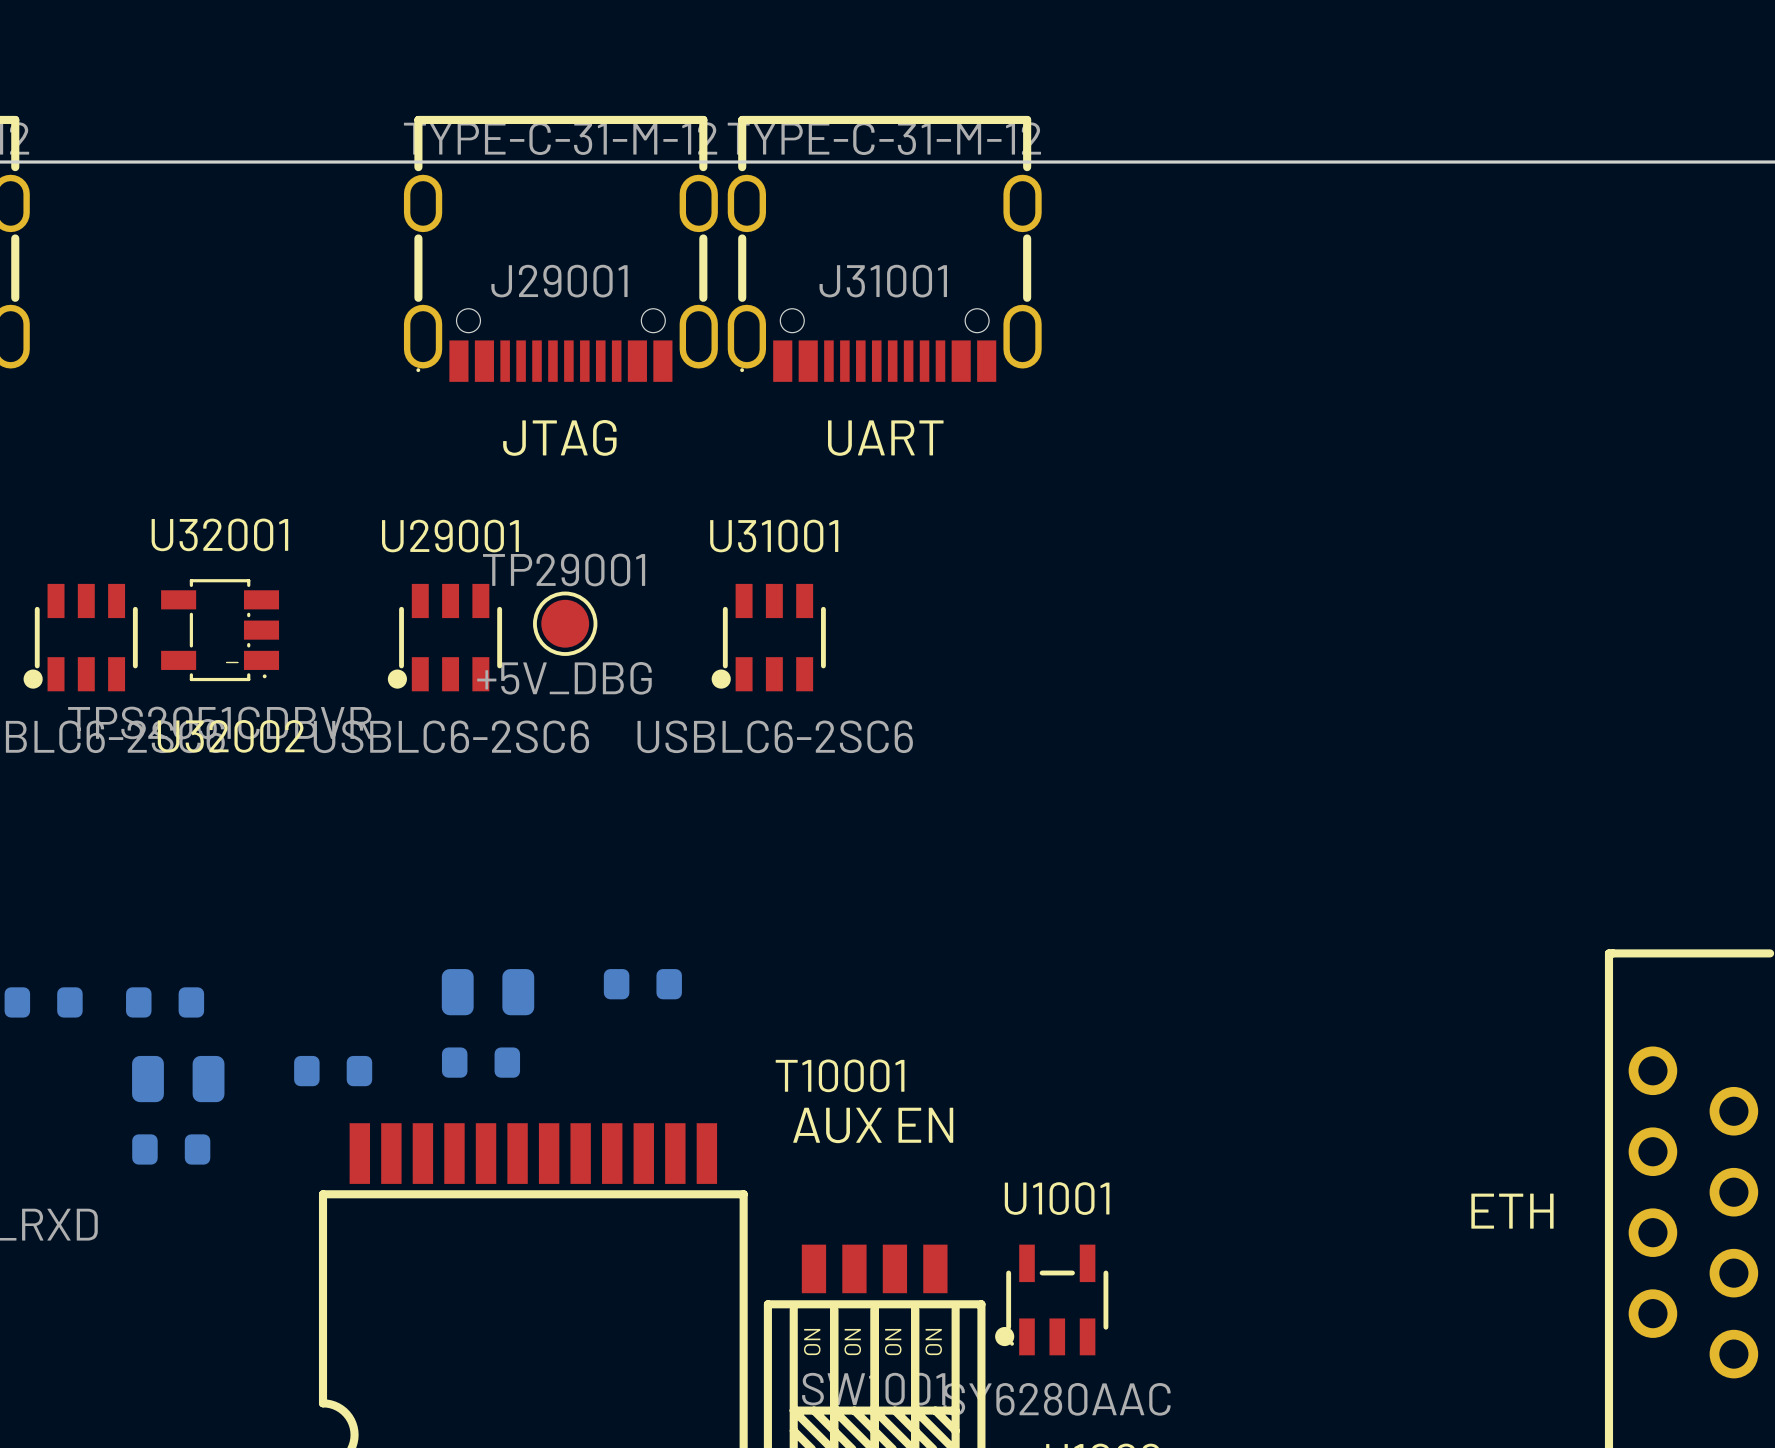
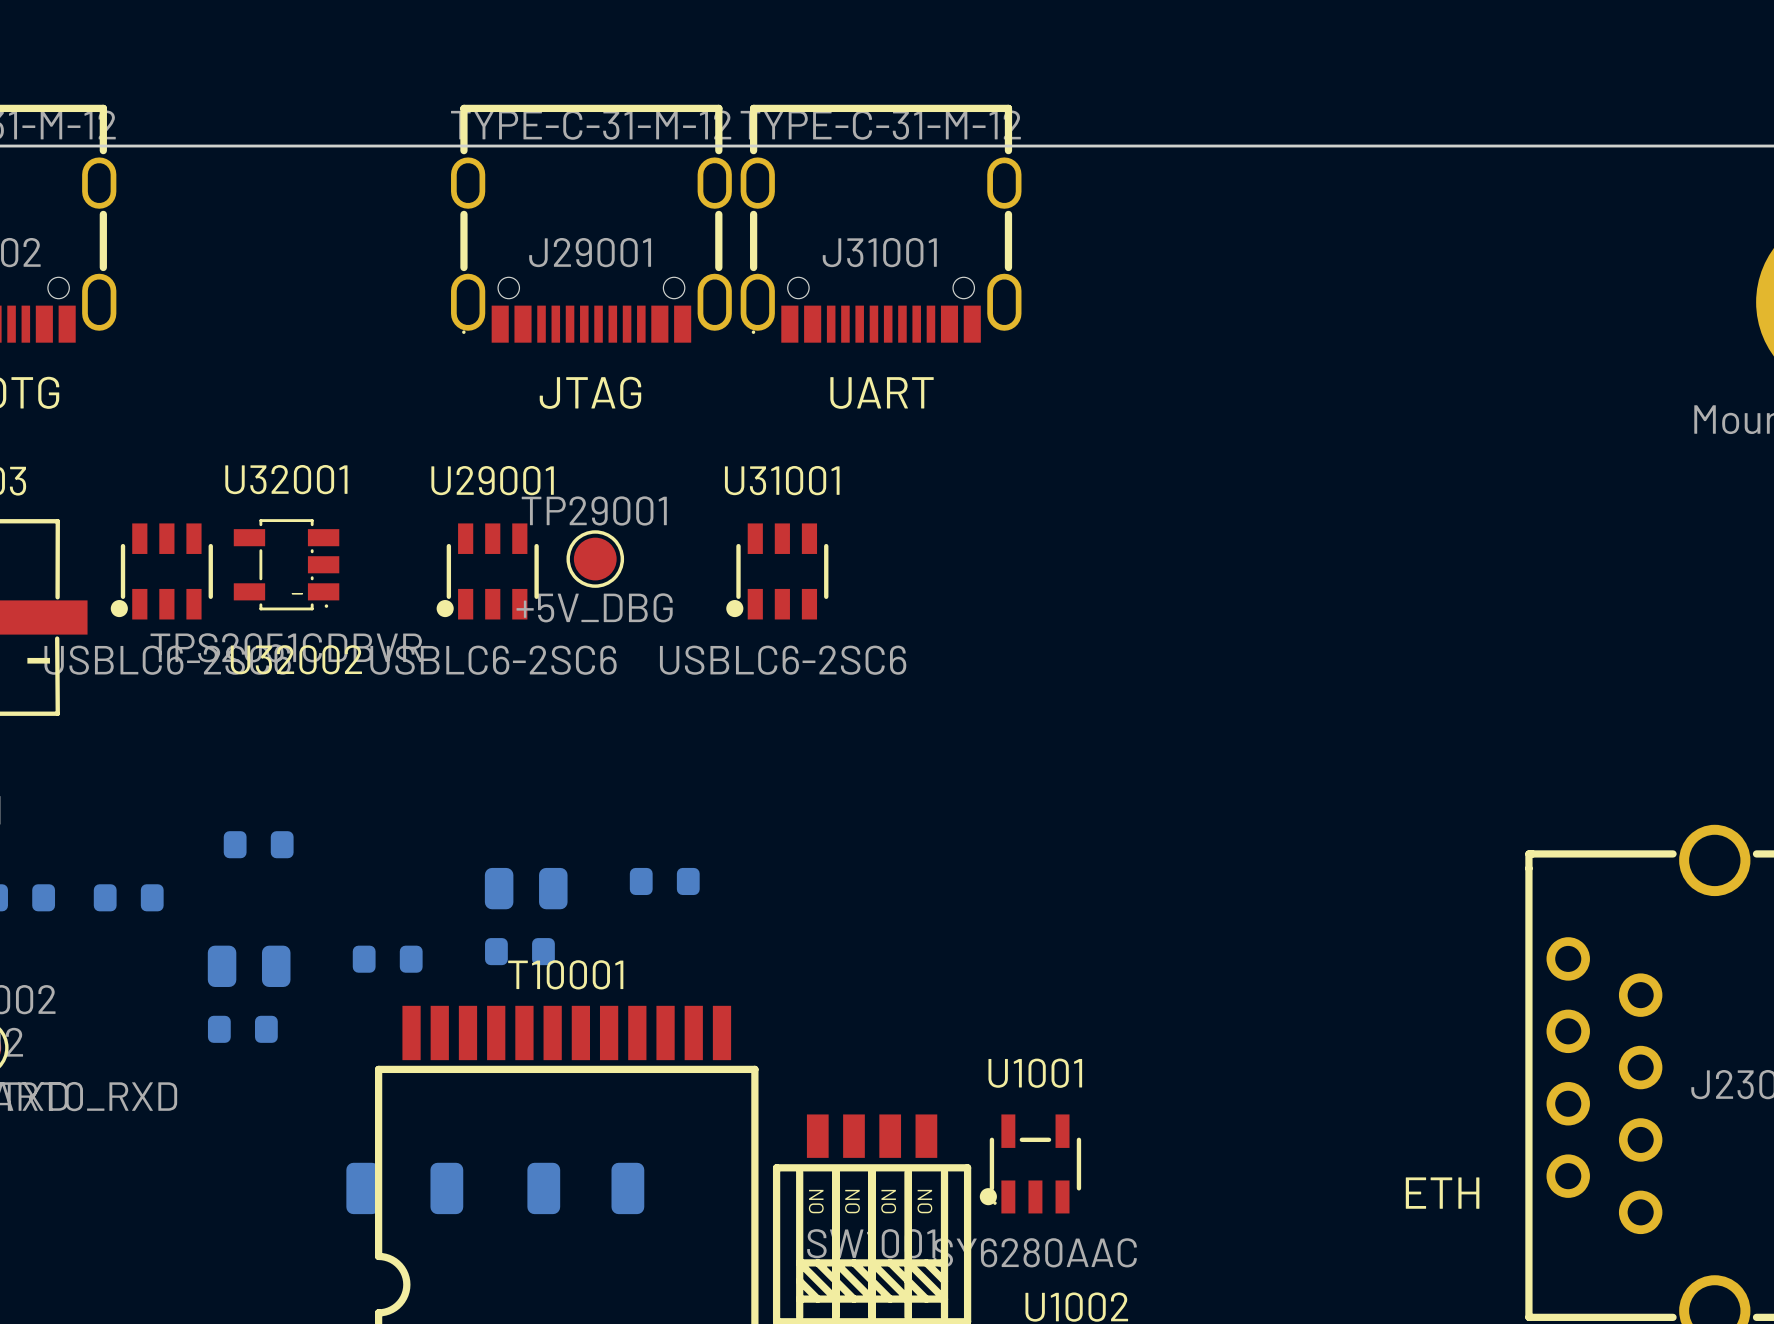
part position: (165, 1002) -> (258, 844)
T10001 name position: T10001 (840, 1075) -> T10001 (565, 974)
text: AUX EN (873, 1125) -> none
text position: ETH (1512, 1211) -> ETH (1442, 1193)
part: none -> (404, 1188)
part: none -> (585, 1188)

